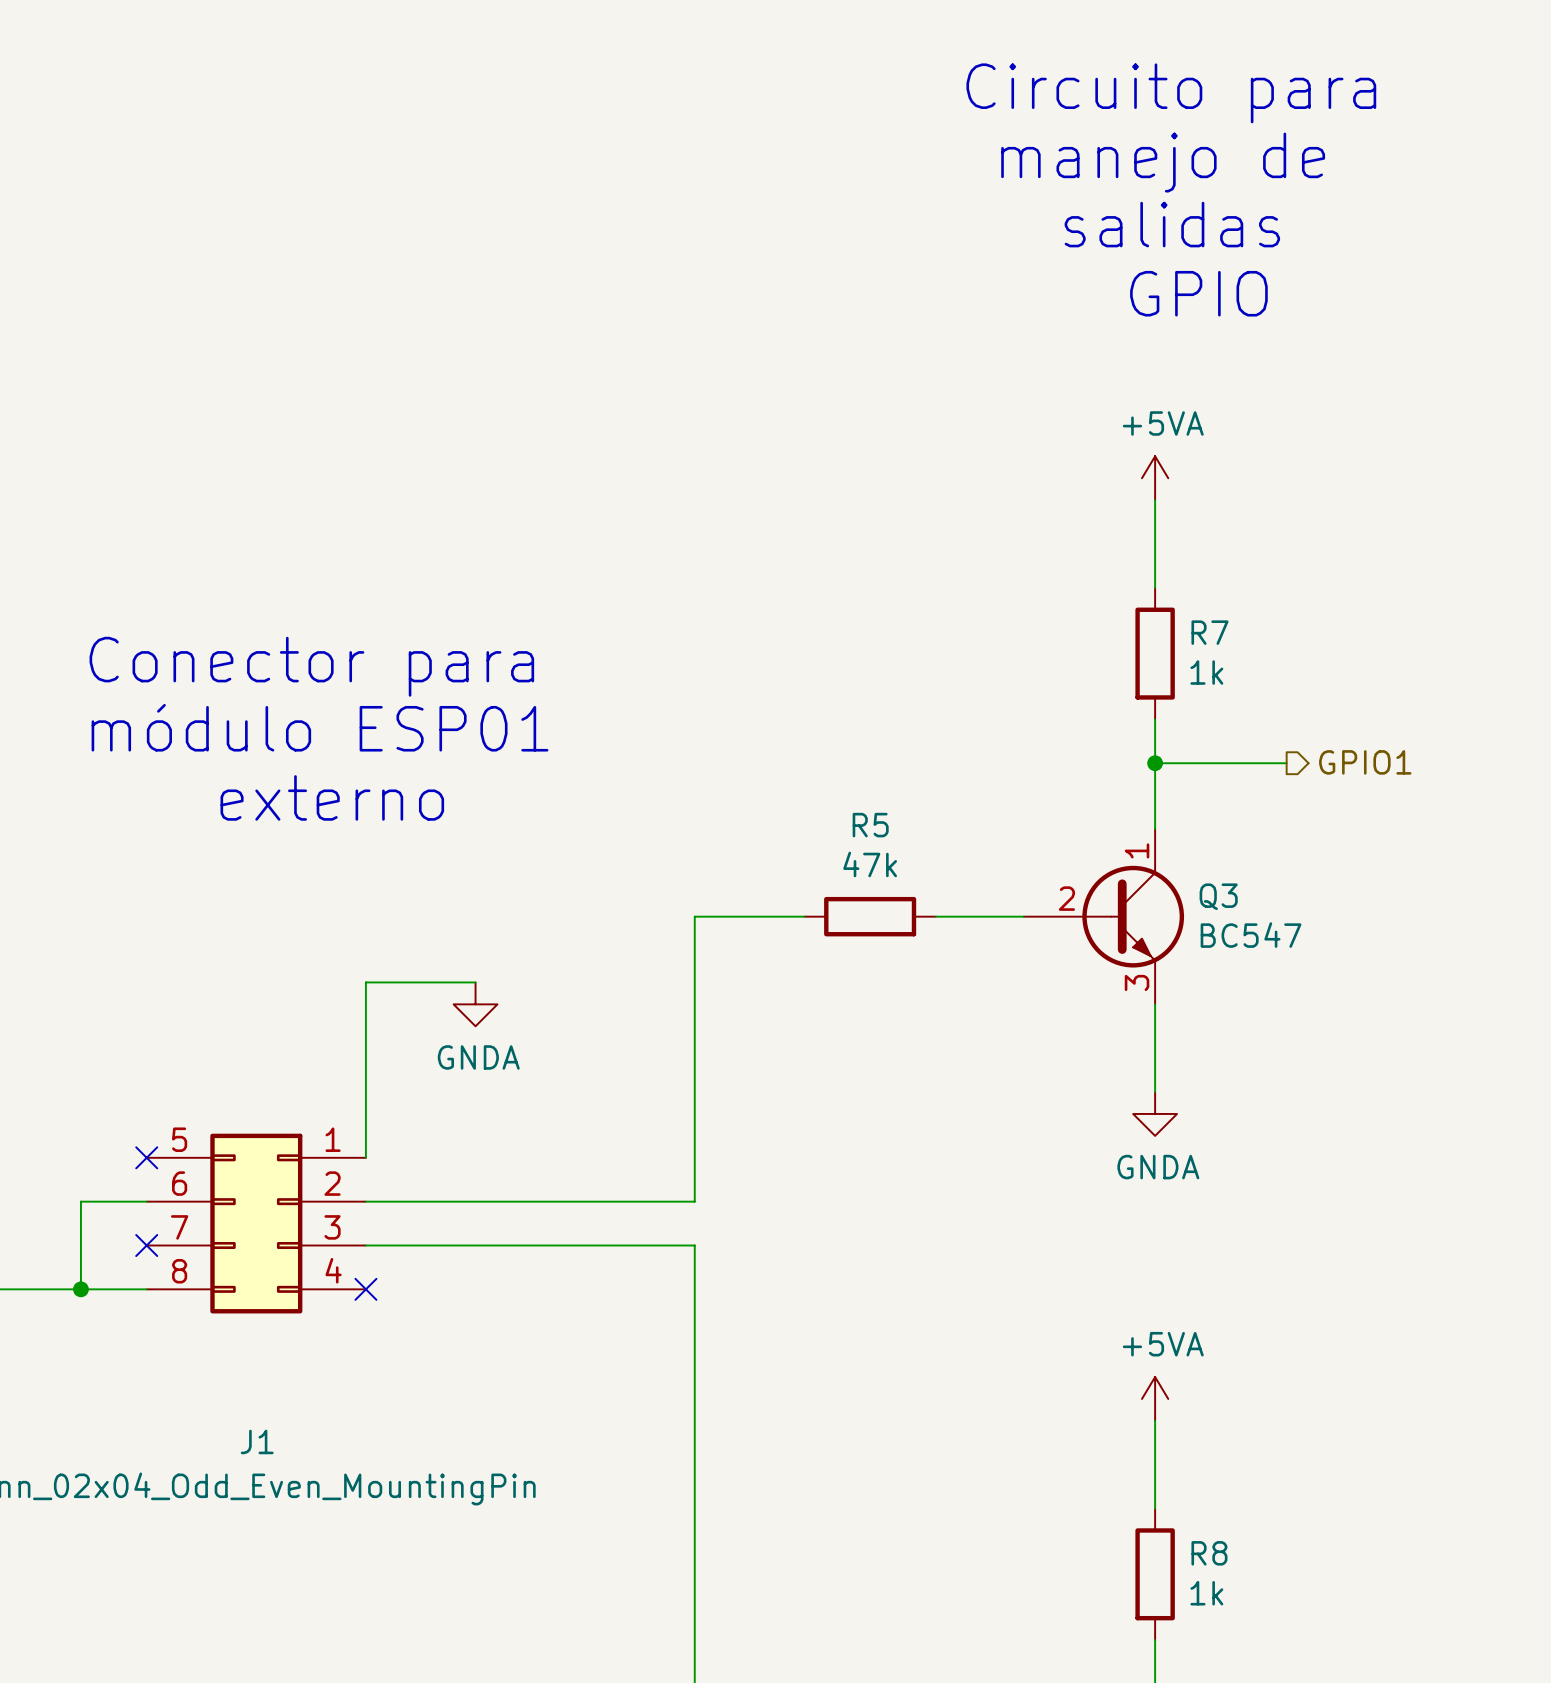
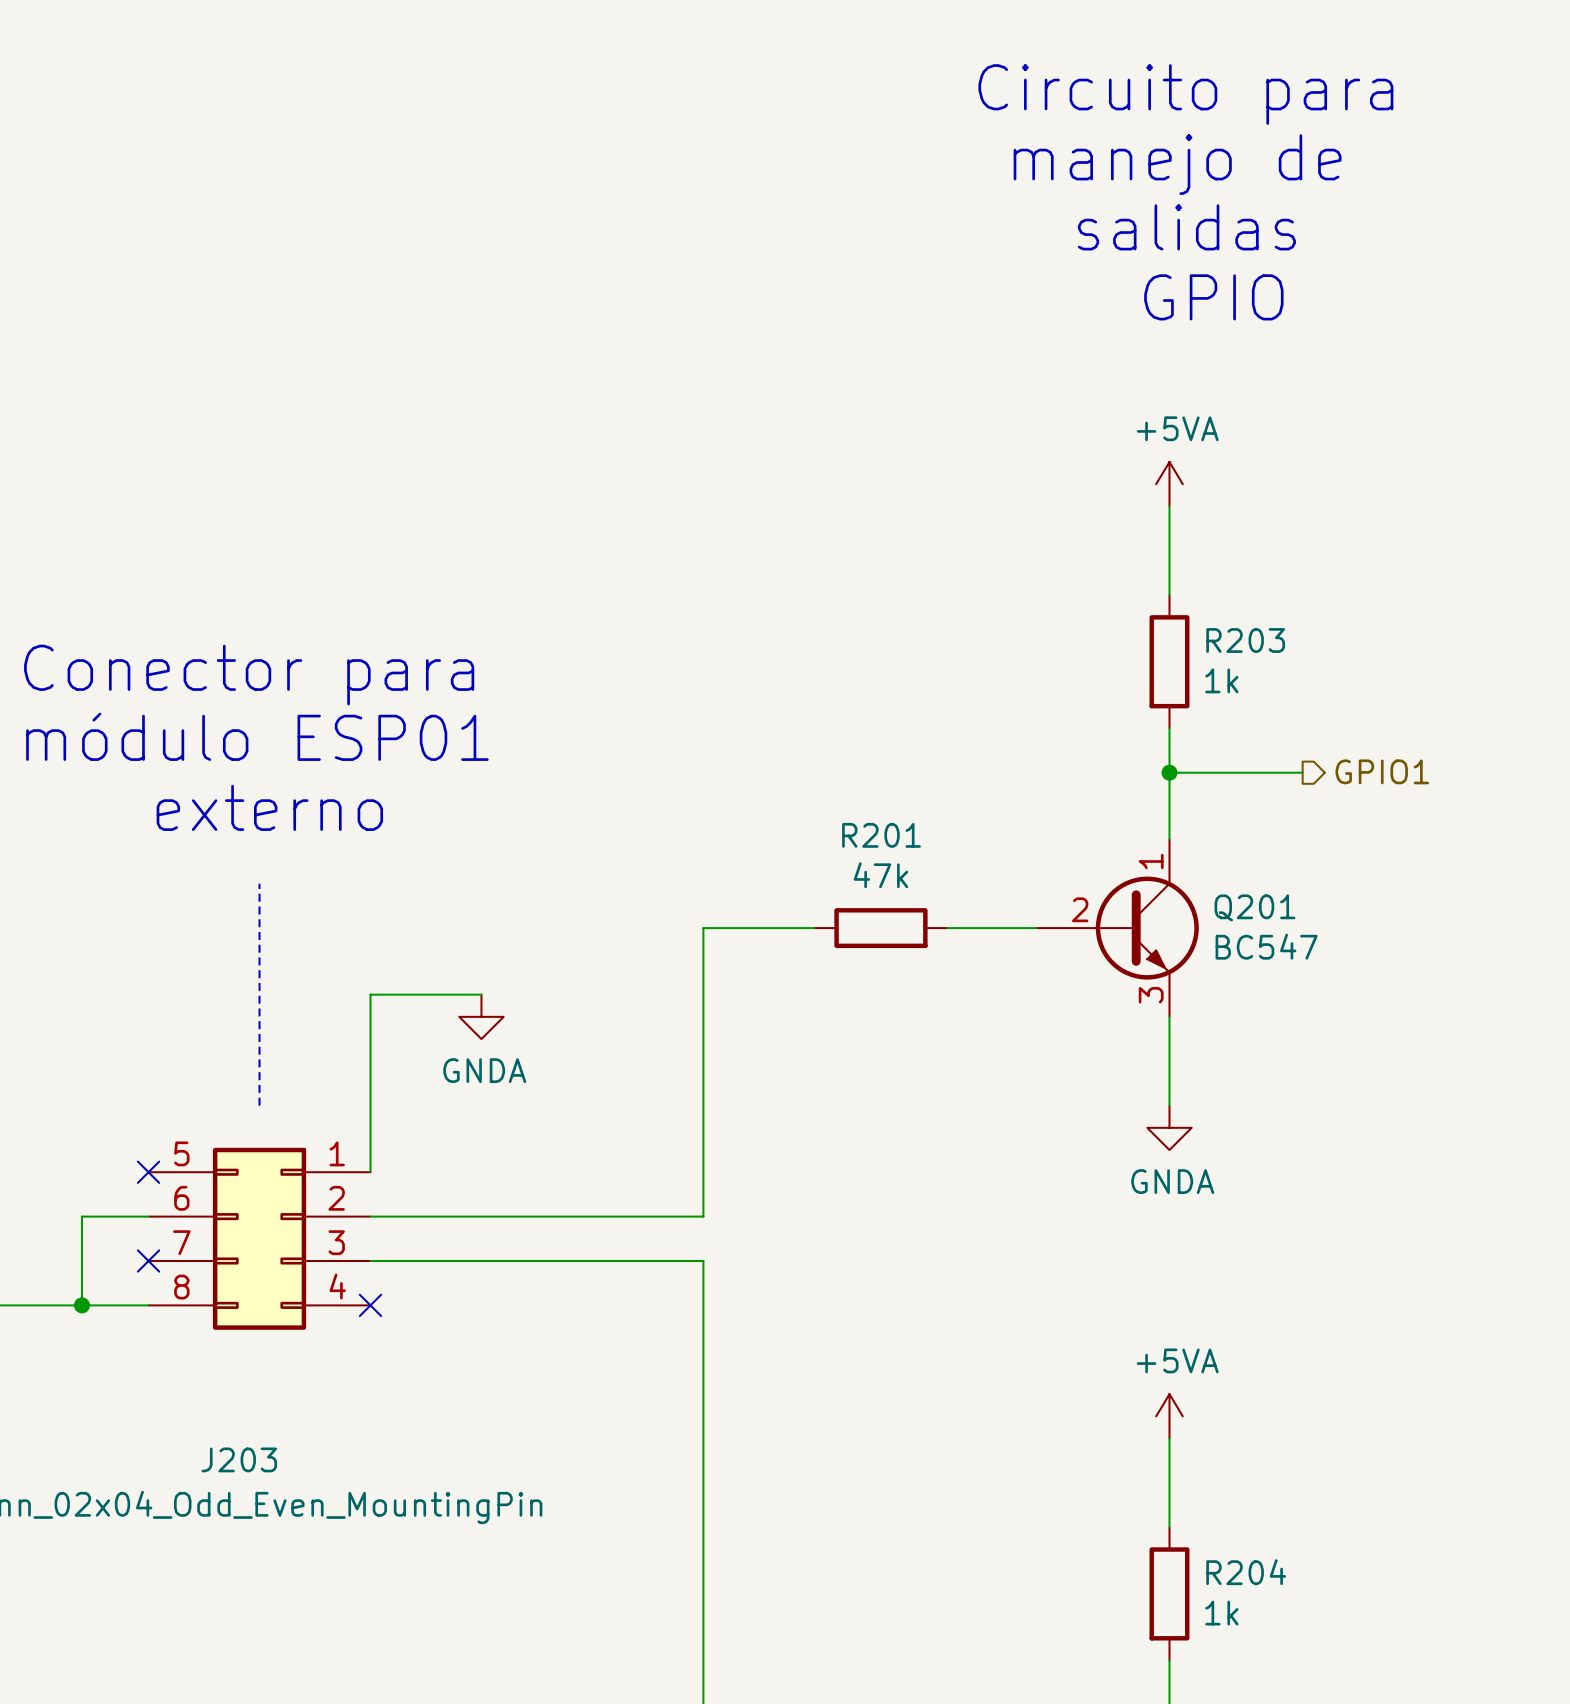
R7 name: R7 (1209, 632) -> R203 (1245, 640)
text position: Conector para (311, 666) -> Conector para (249, 675)
text position: módulo ESP01 (320, 727) -> módulo ESP01 (257, 736)
text position: externo (332, 797) -> externo (269, 807)
R5 name: R5 (870, 825) -> R201 (881, 835)
line: none -> (259, 883) (259, 1105)
Q3 name: Q3 (1218, 896) -> Q201 (1254, 907)
J1 name: J1 (257, 1441) -> J203 (239, 1459)
R8 name: R8 (1209, 1553) -> R204 (1246, 1572)

